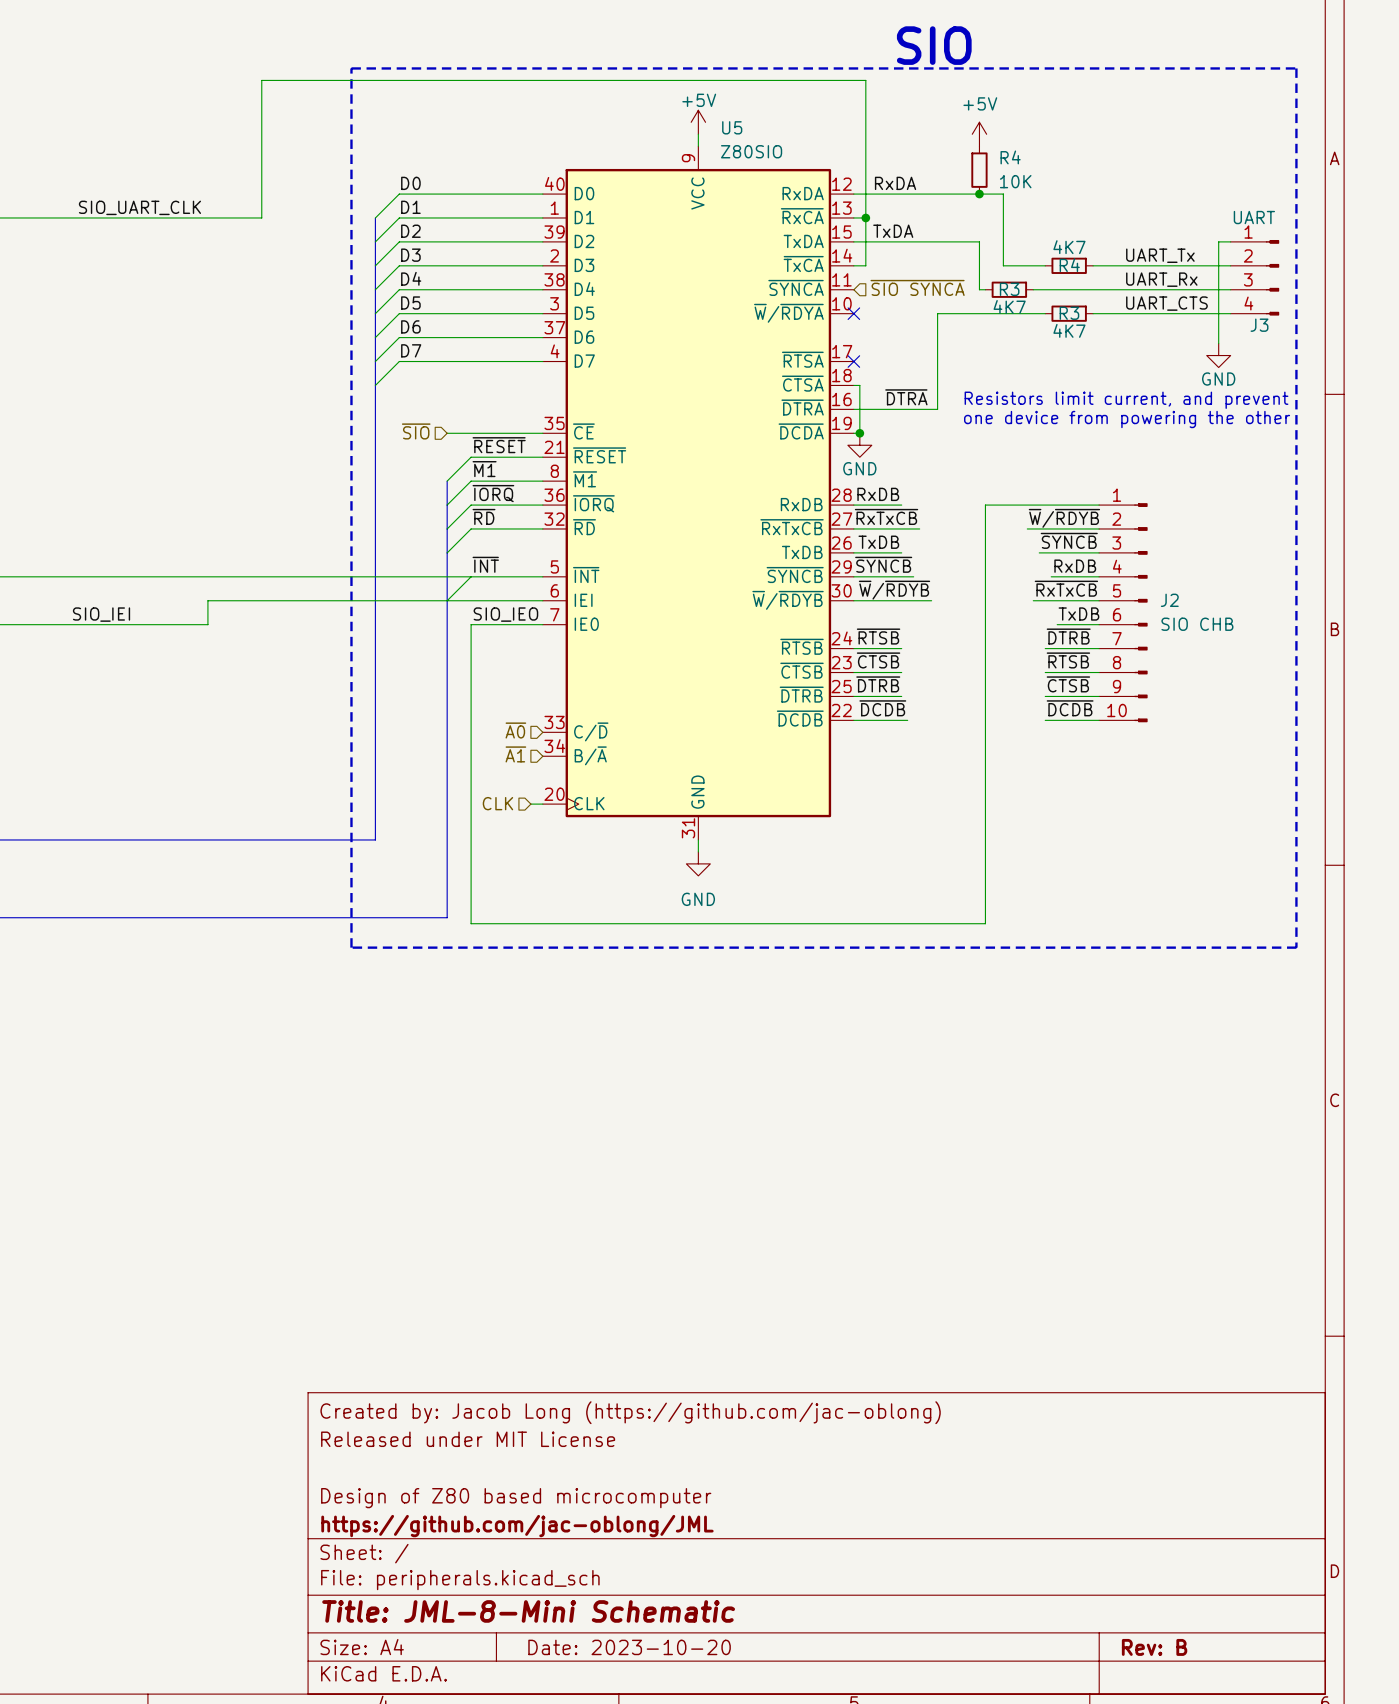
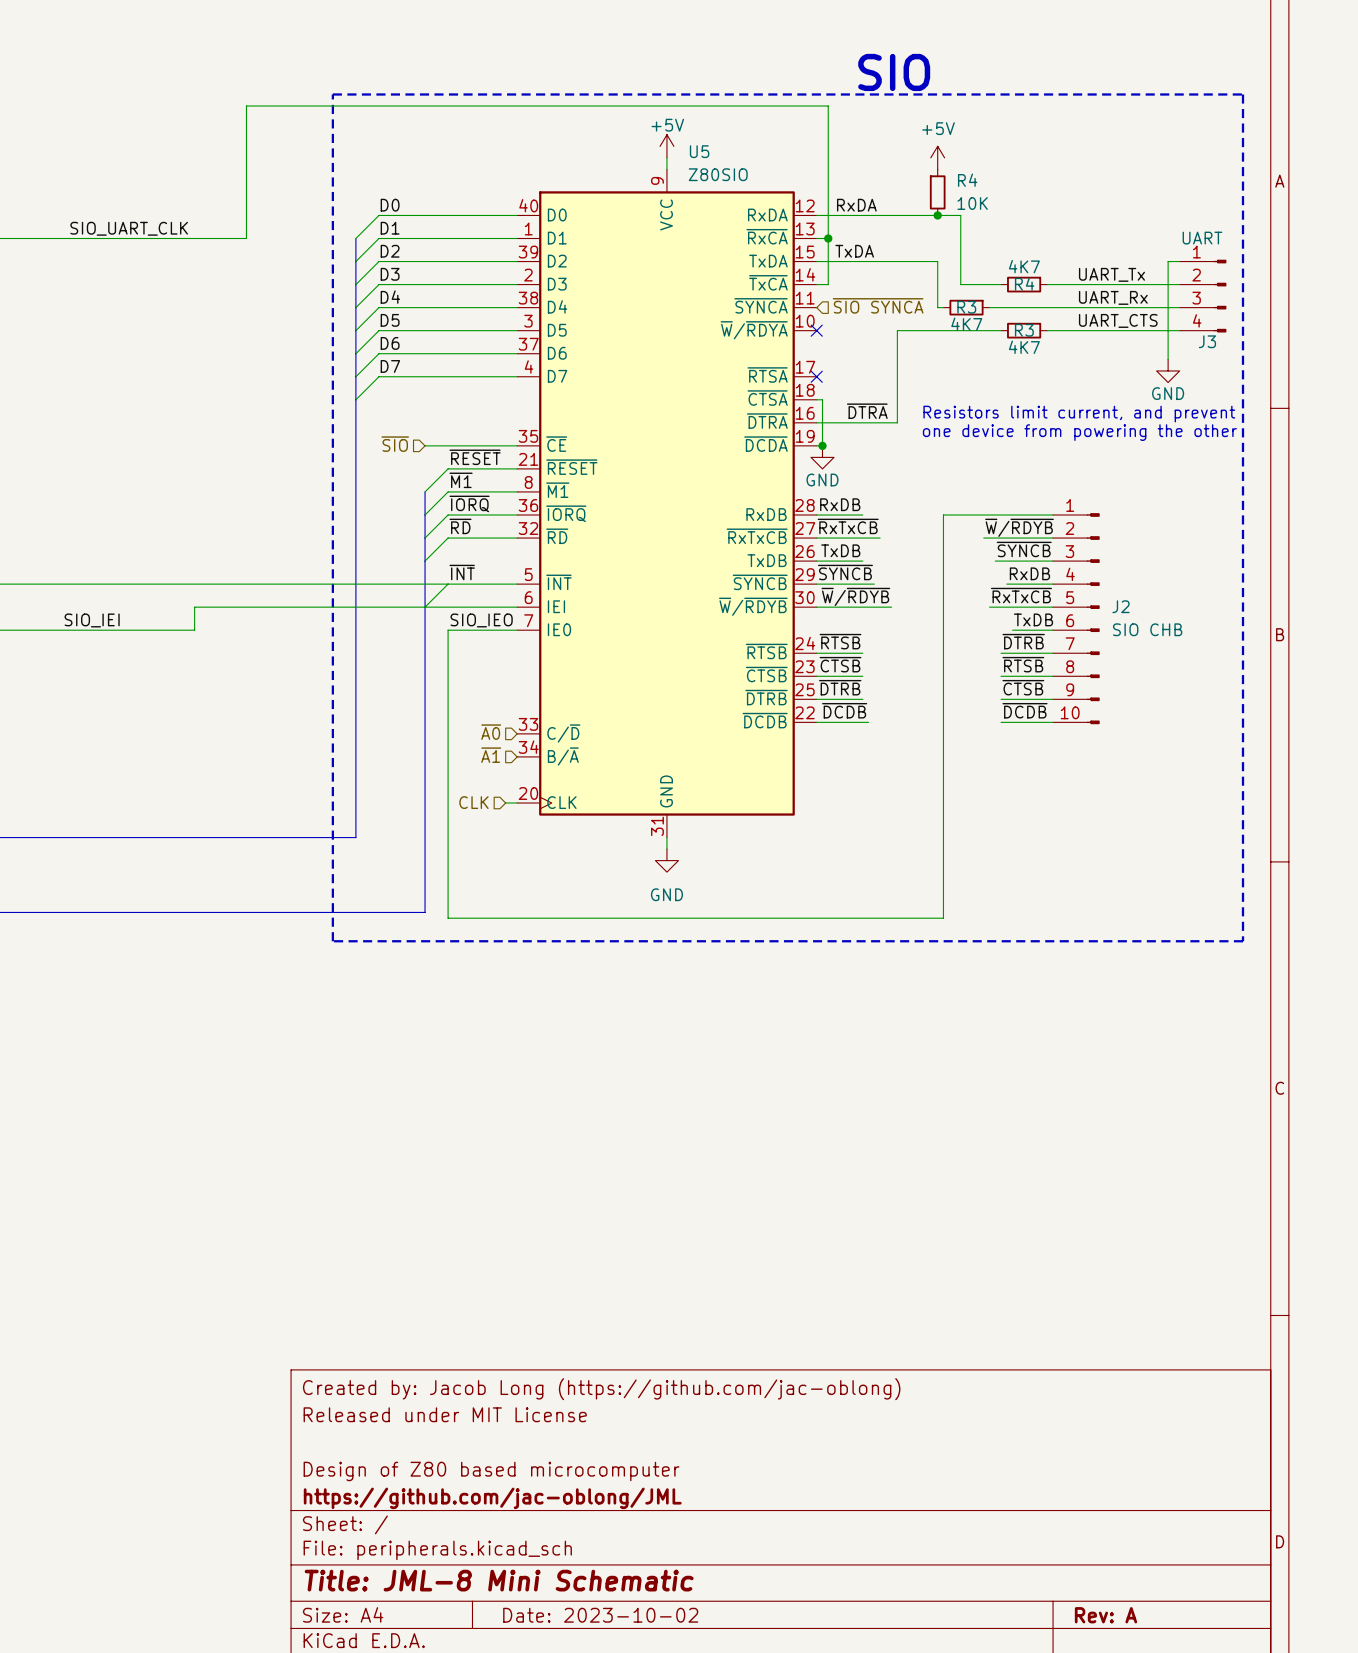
title block: Title: JML-8-Mini Schematic (528, 1611) -> Title: JML-8 Mini Schematic (499, 1580)
title block: Date: 2023-10-20 (629, 1647) -> Date: 2023-10-02 (600, 1615)
title block: Rev: B (1154, 1647) -> Rev: A (1106, 1615)

